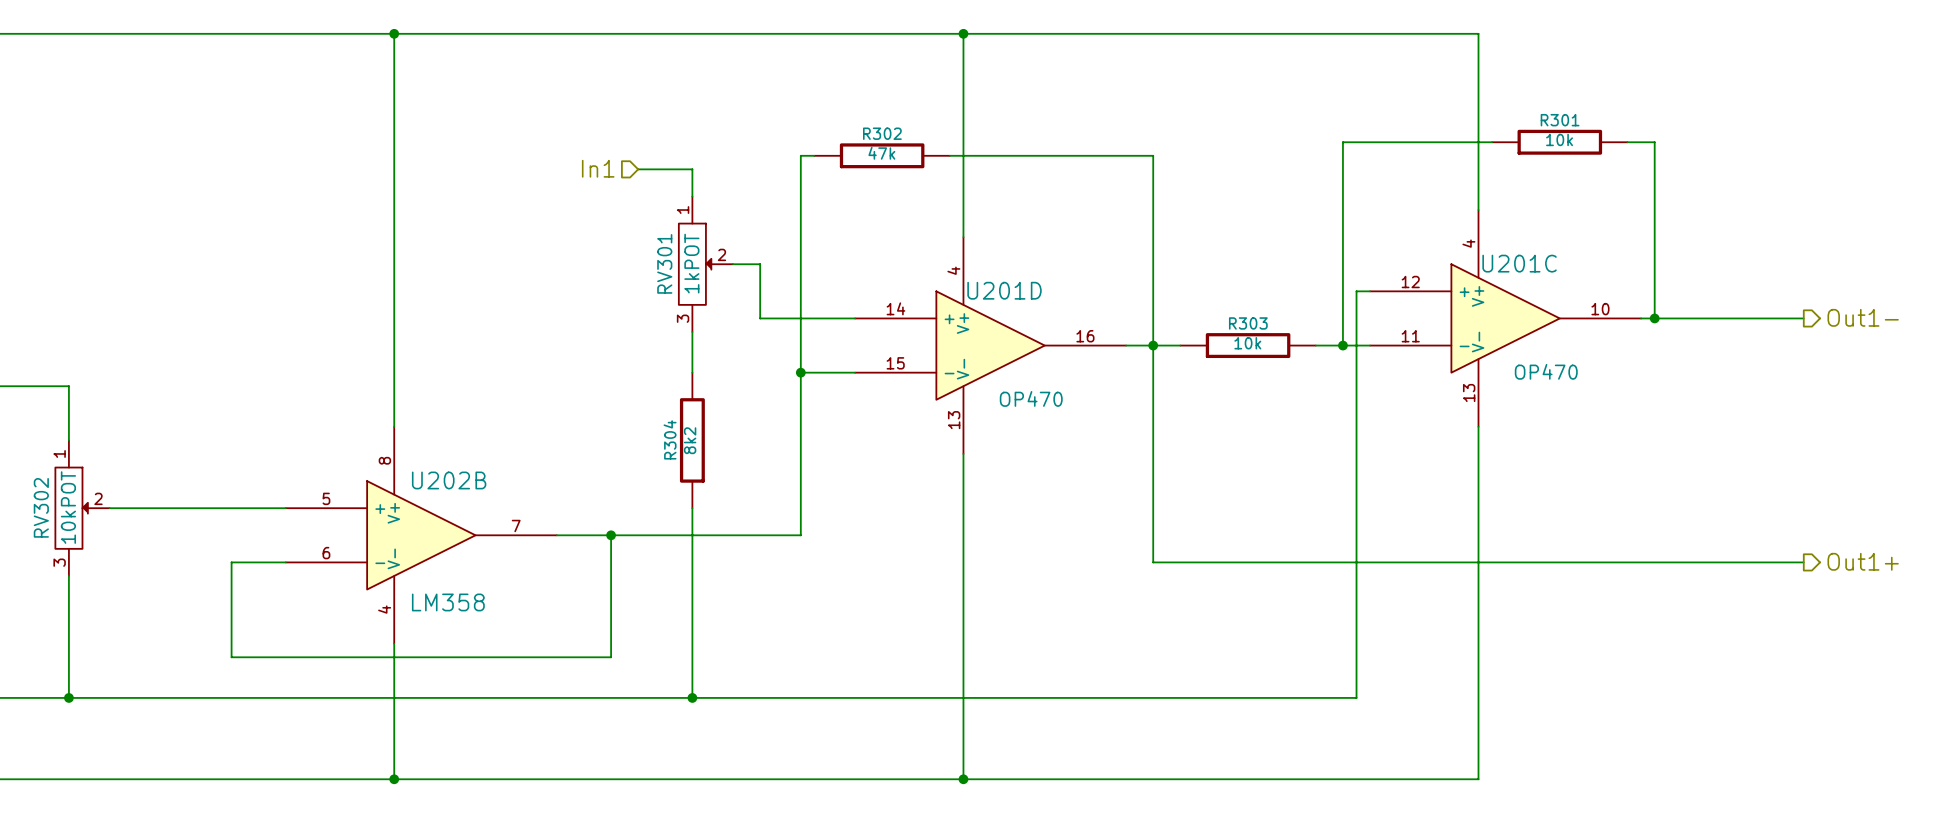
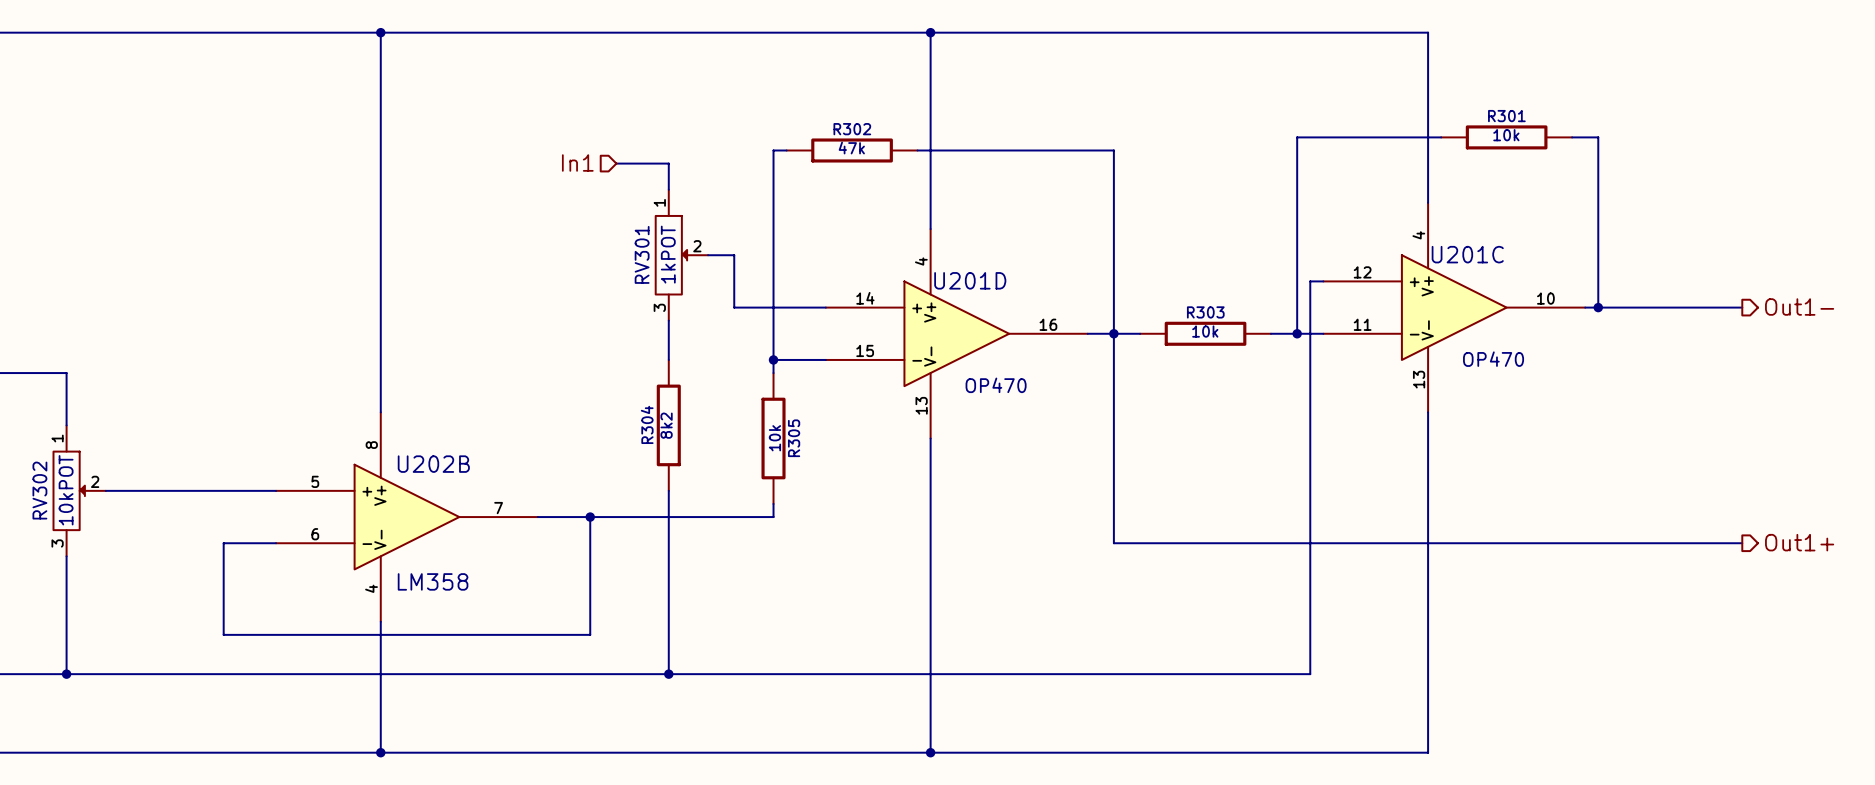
wire: (800, 386) (800, 521) -> none
R305: none -> 10k (773, 438)

